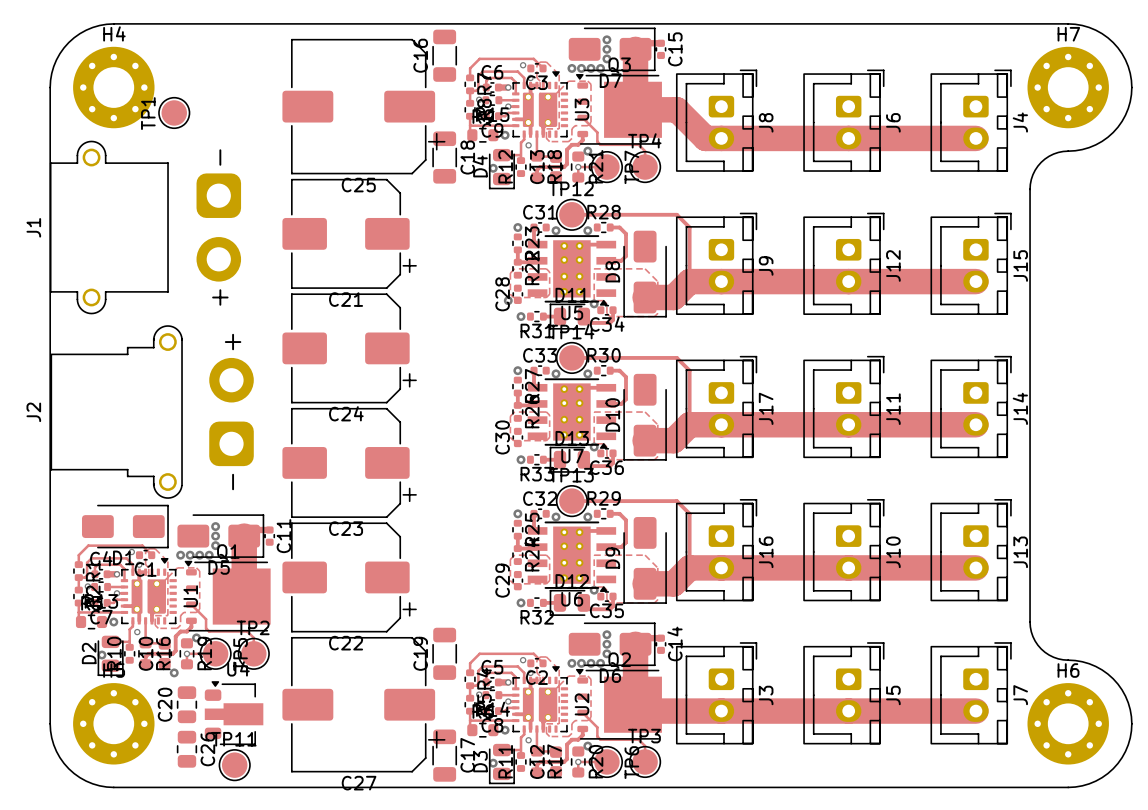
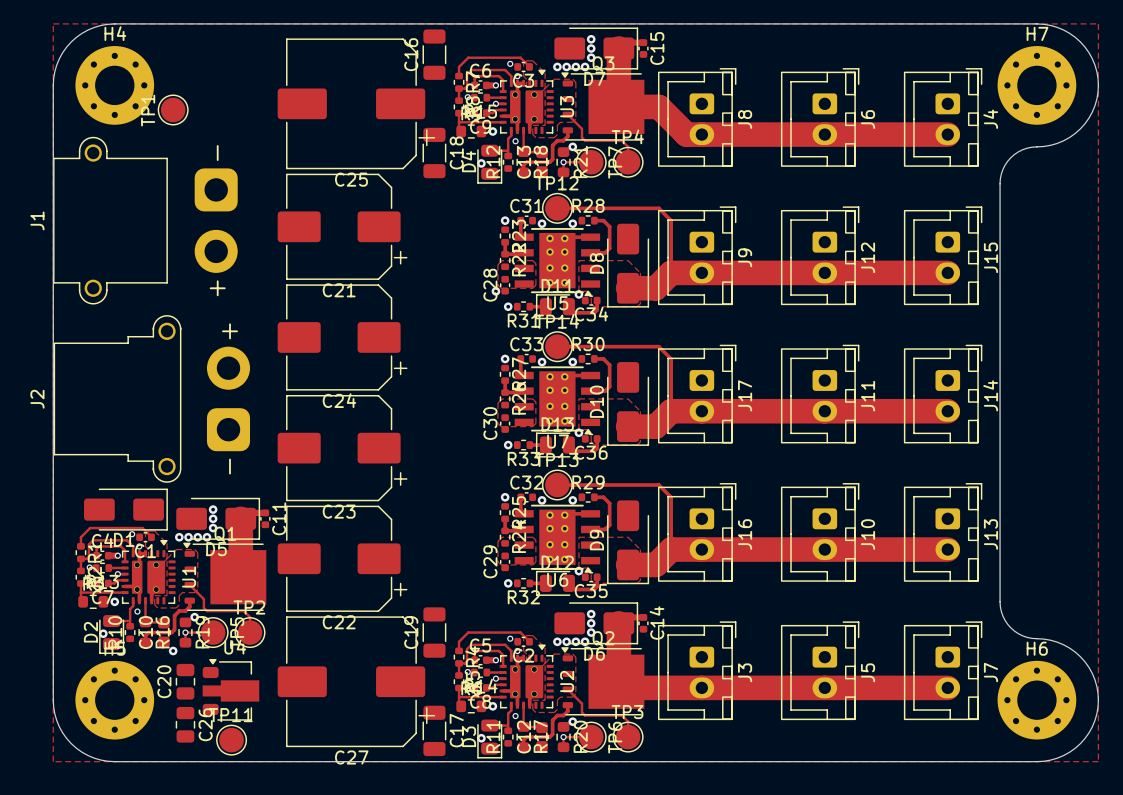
zone outline: none -> (53, 23) (1098, 23) (1098, 761) (53, 761) (53, 23)

